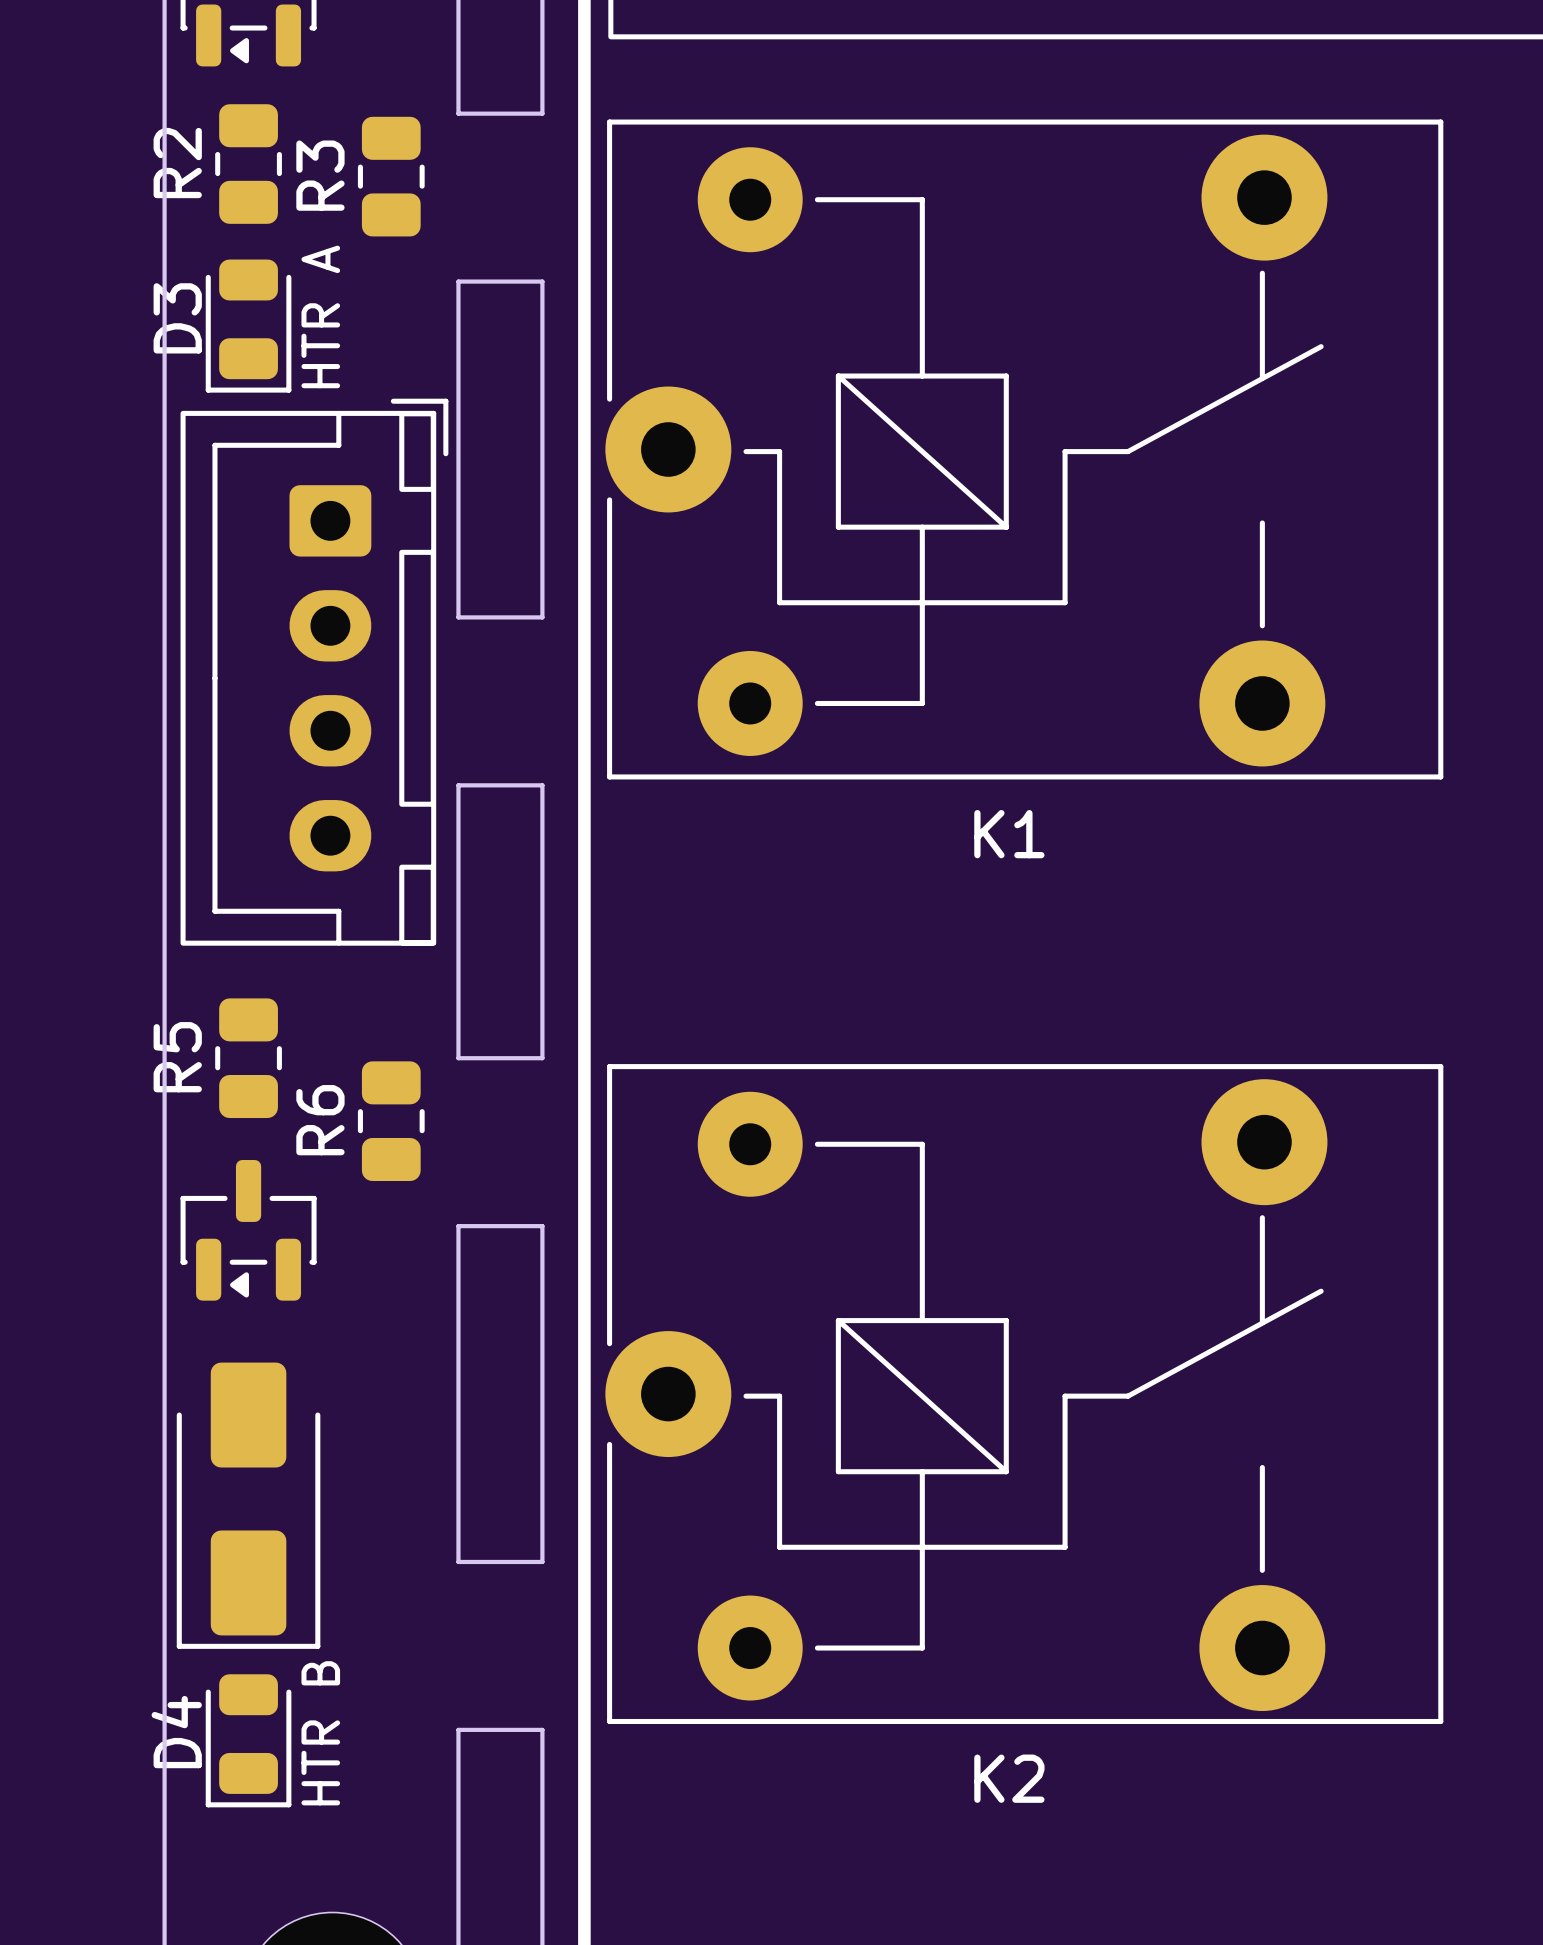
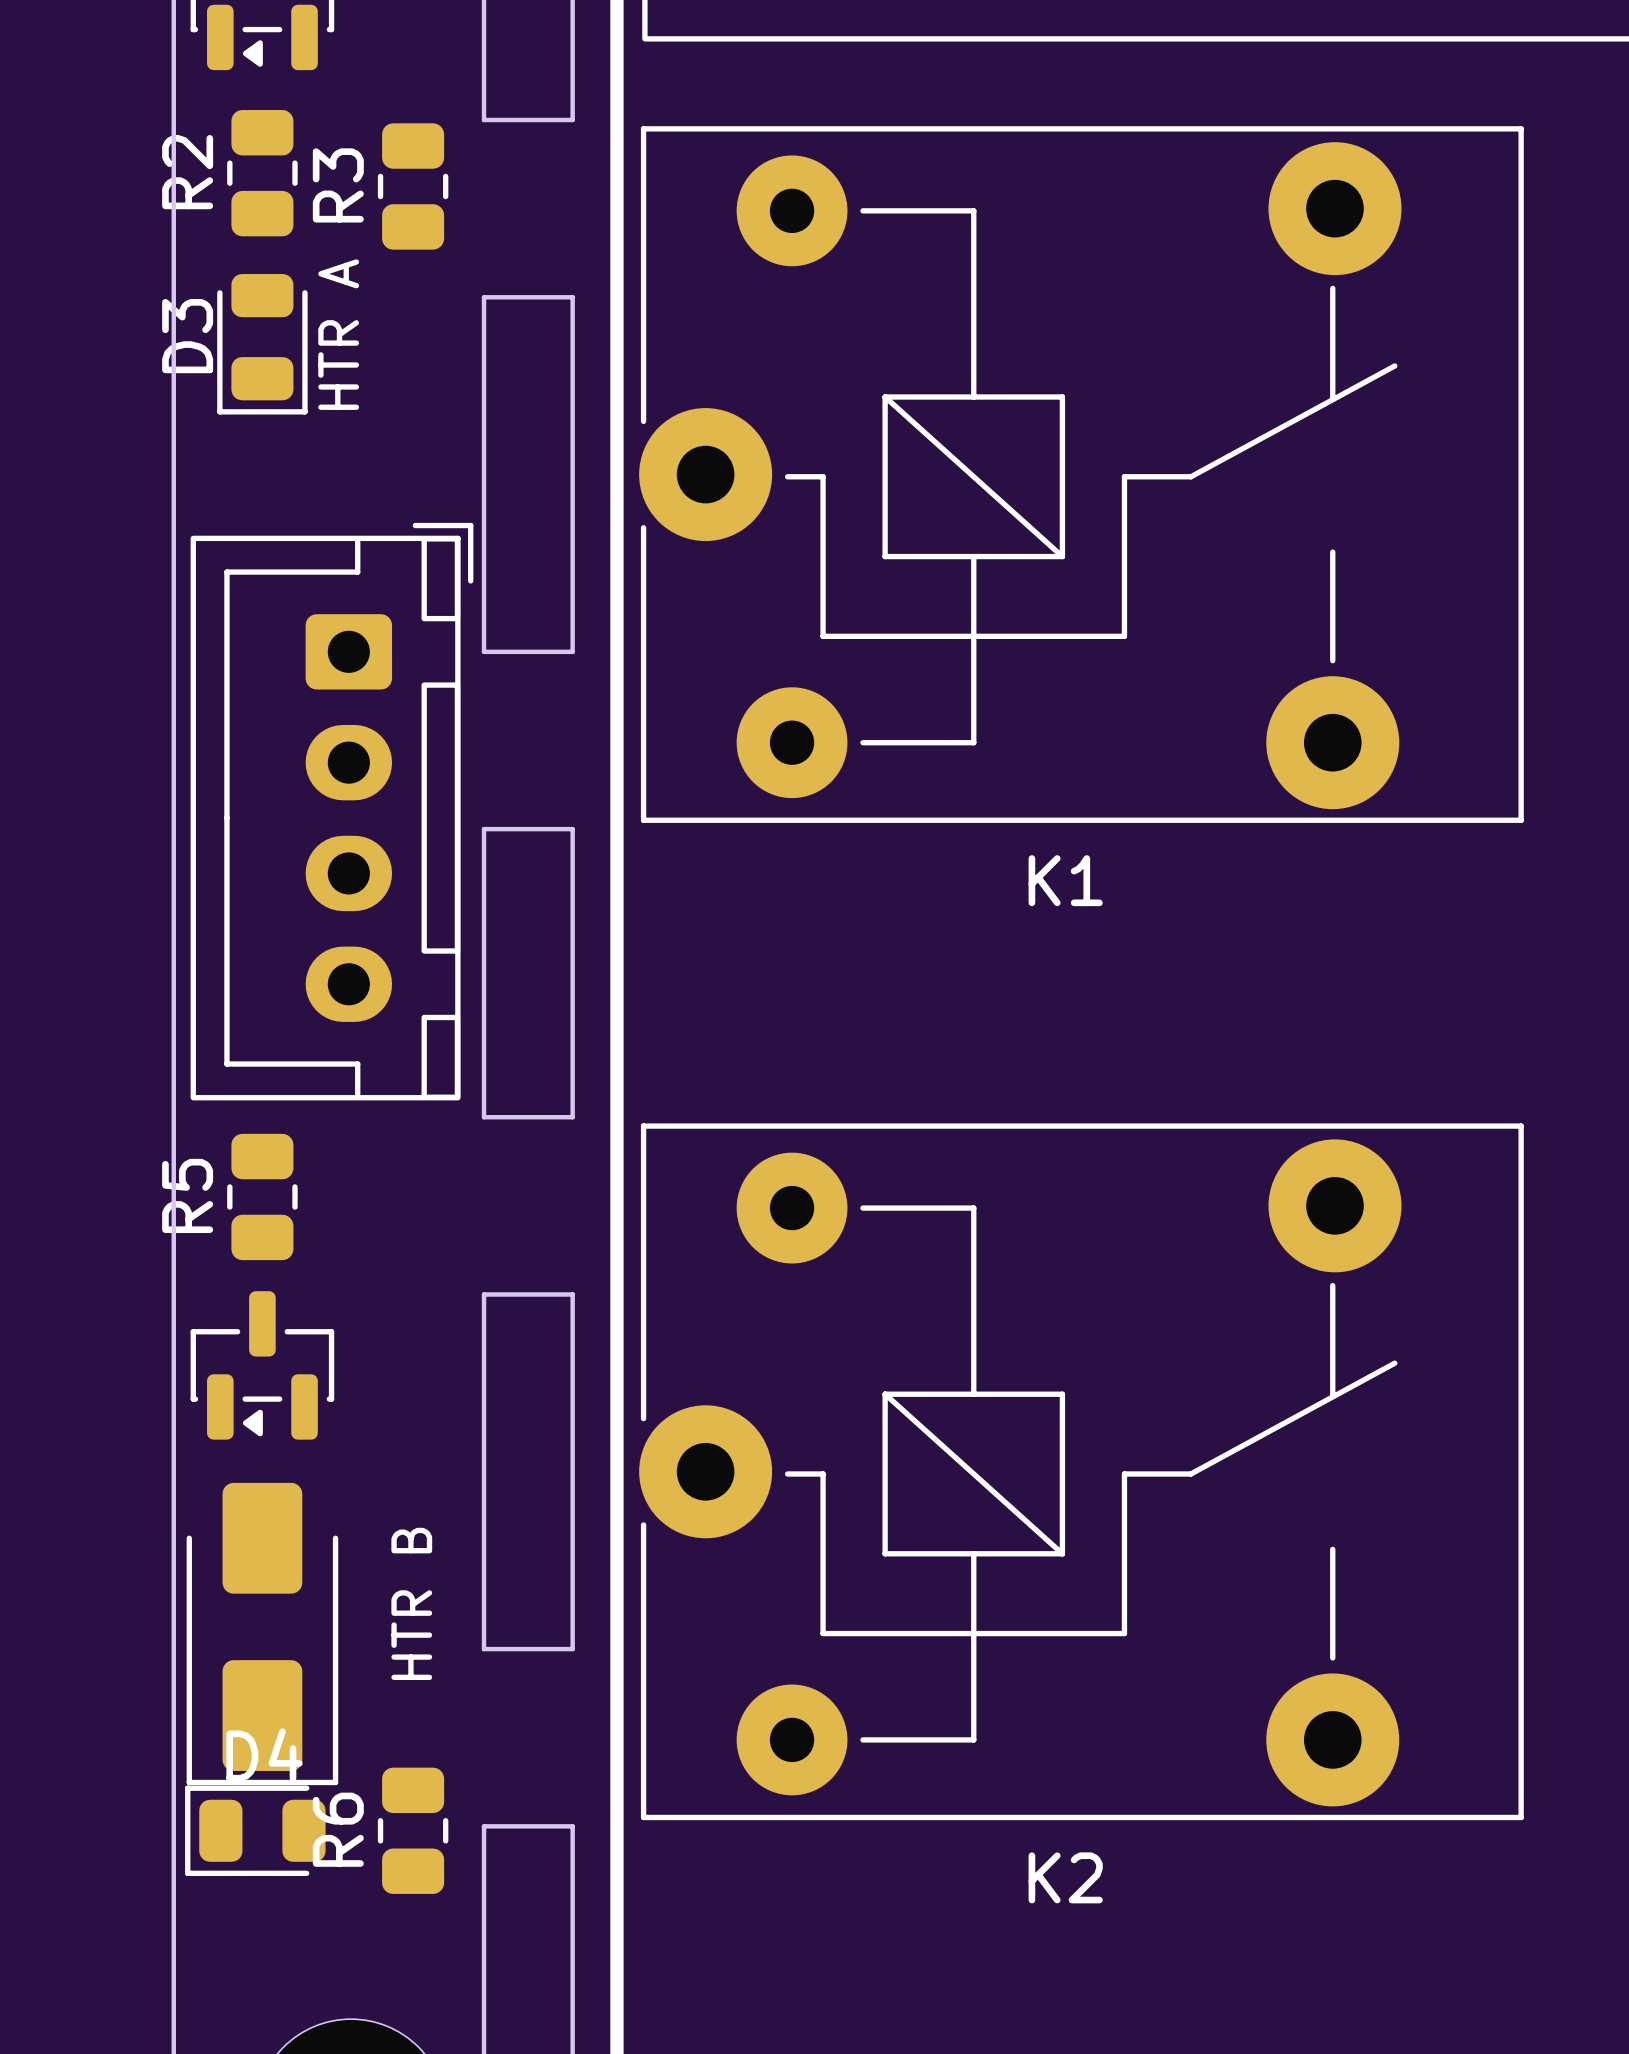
part position: (314, 672) -> (332, 811)
R5 position: (248, 1058) -> (262, 1196)
R6 position: (391, 1121) -> (413, 1830)
part position: (248, 1230) -> (262, 1365)
part position: (248, 1505) -> (262, 1633)
text position: HTR B (320, 1733) -> HTR B (411, 1603)
D4 rotation: 0° (248, 1740) -> 90° clockwise (255, 1830)

